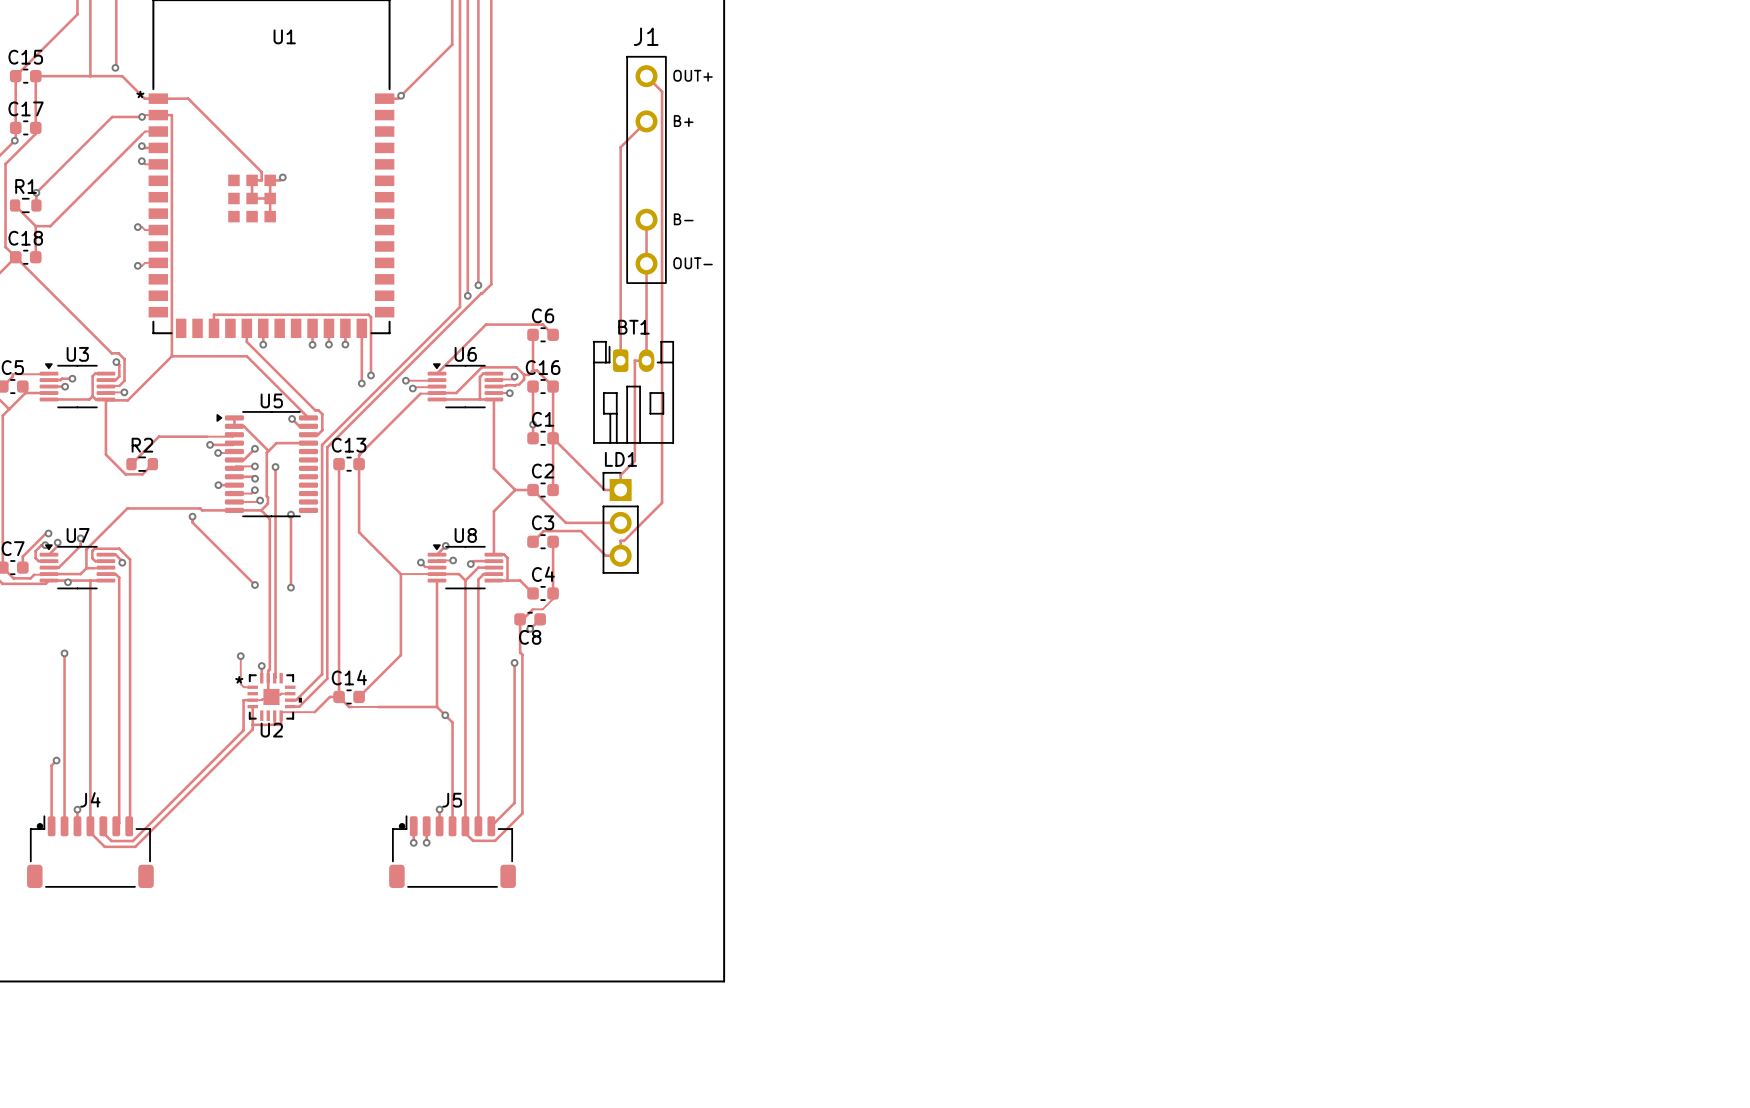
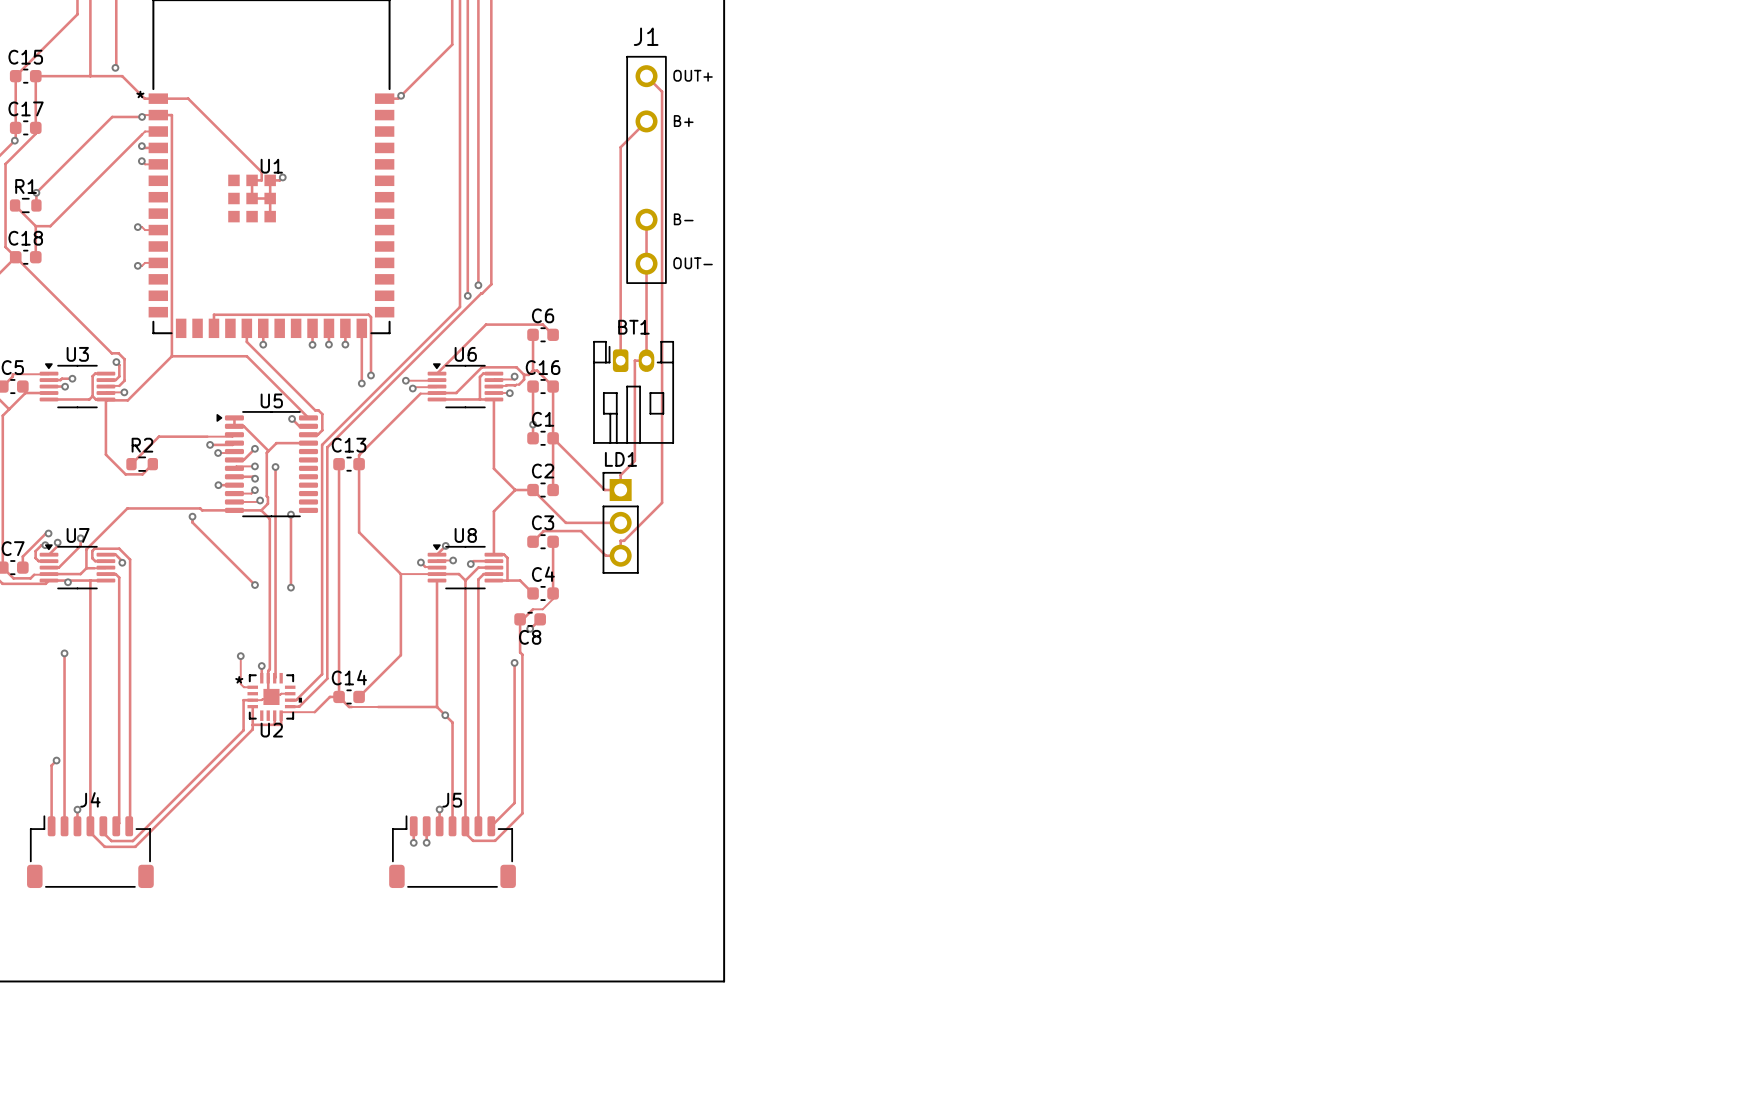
U1 name position: U1 (284, 36) -> U1 (271, 166)
J4 footprint: [27, 815, 154, 889] -> [27, 815, 154, 889]
J5 footprint: [389, 815, 516, 889] -> [389, 815, 516, 889]

